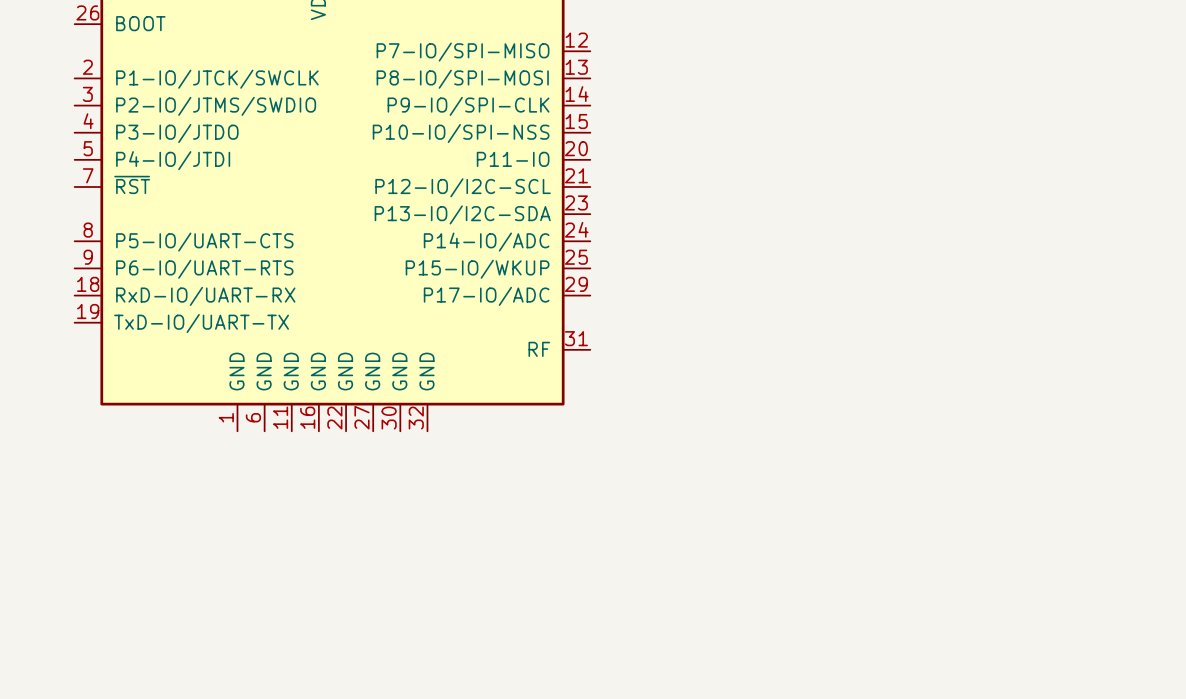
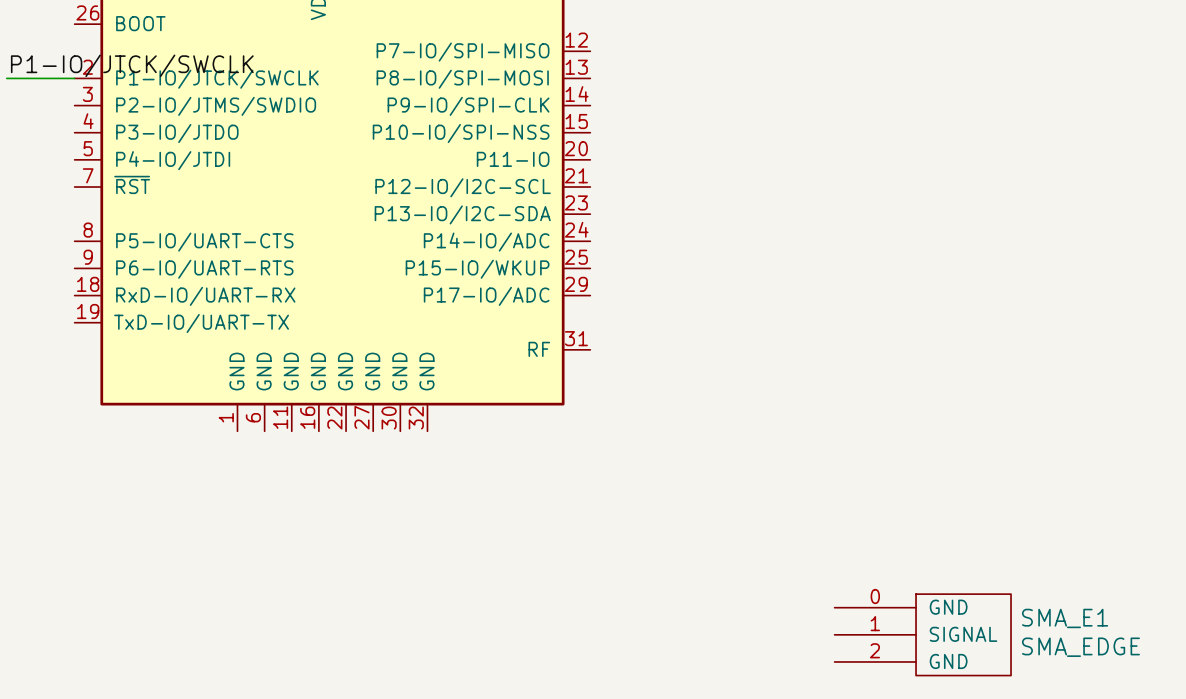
label: none -> P1-IO/JTCK/SWCLK (132, 65)
wire: none -> (6, 78) (74, 78)
SMA_E1: none -> SMA_EDGE (922, 634)

